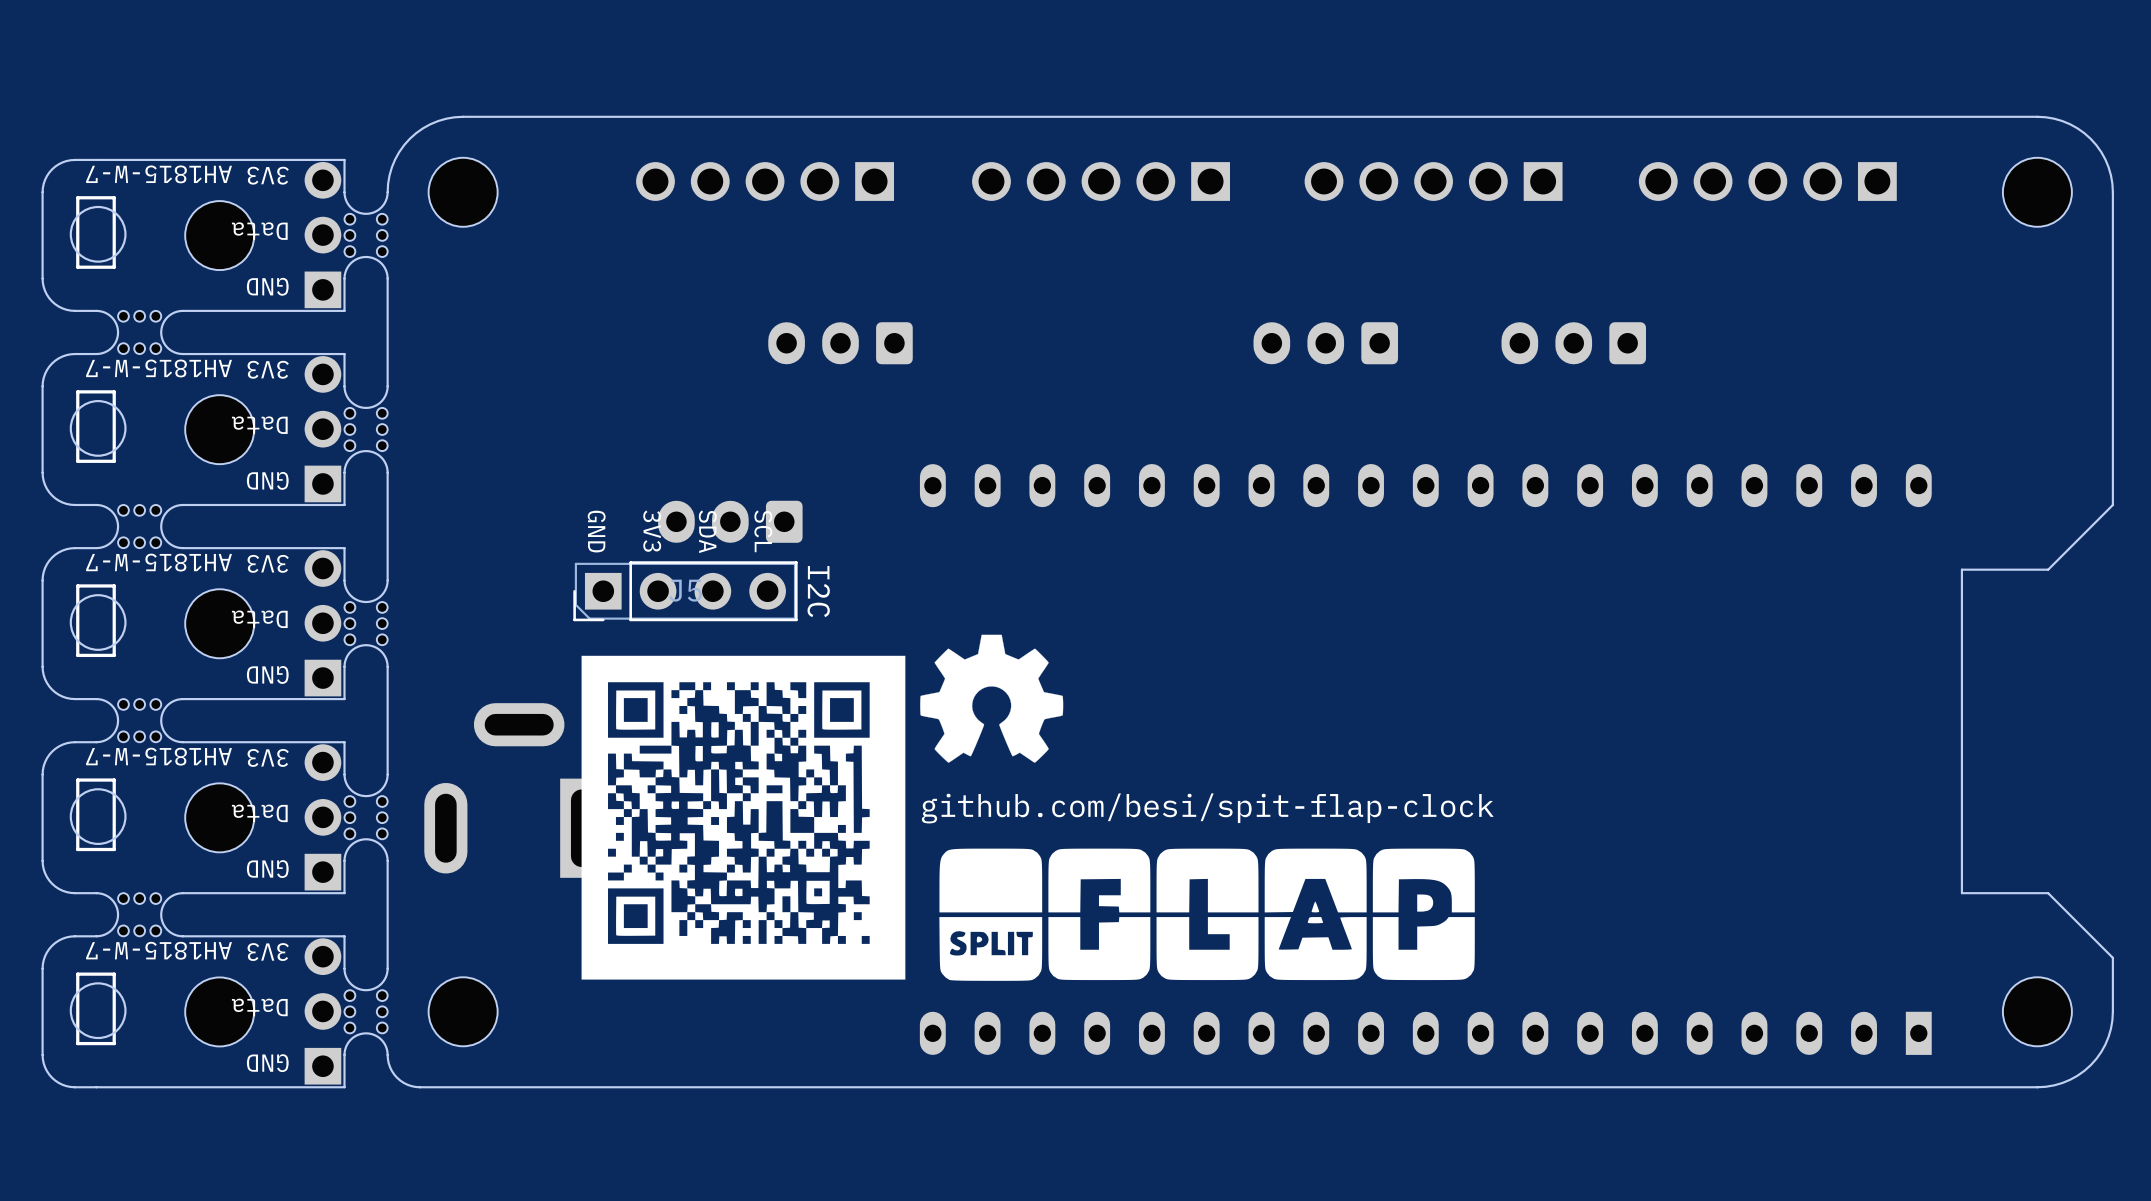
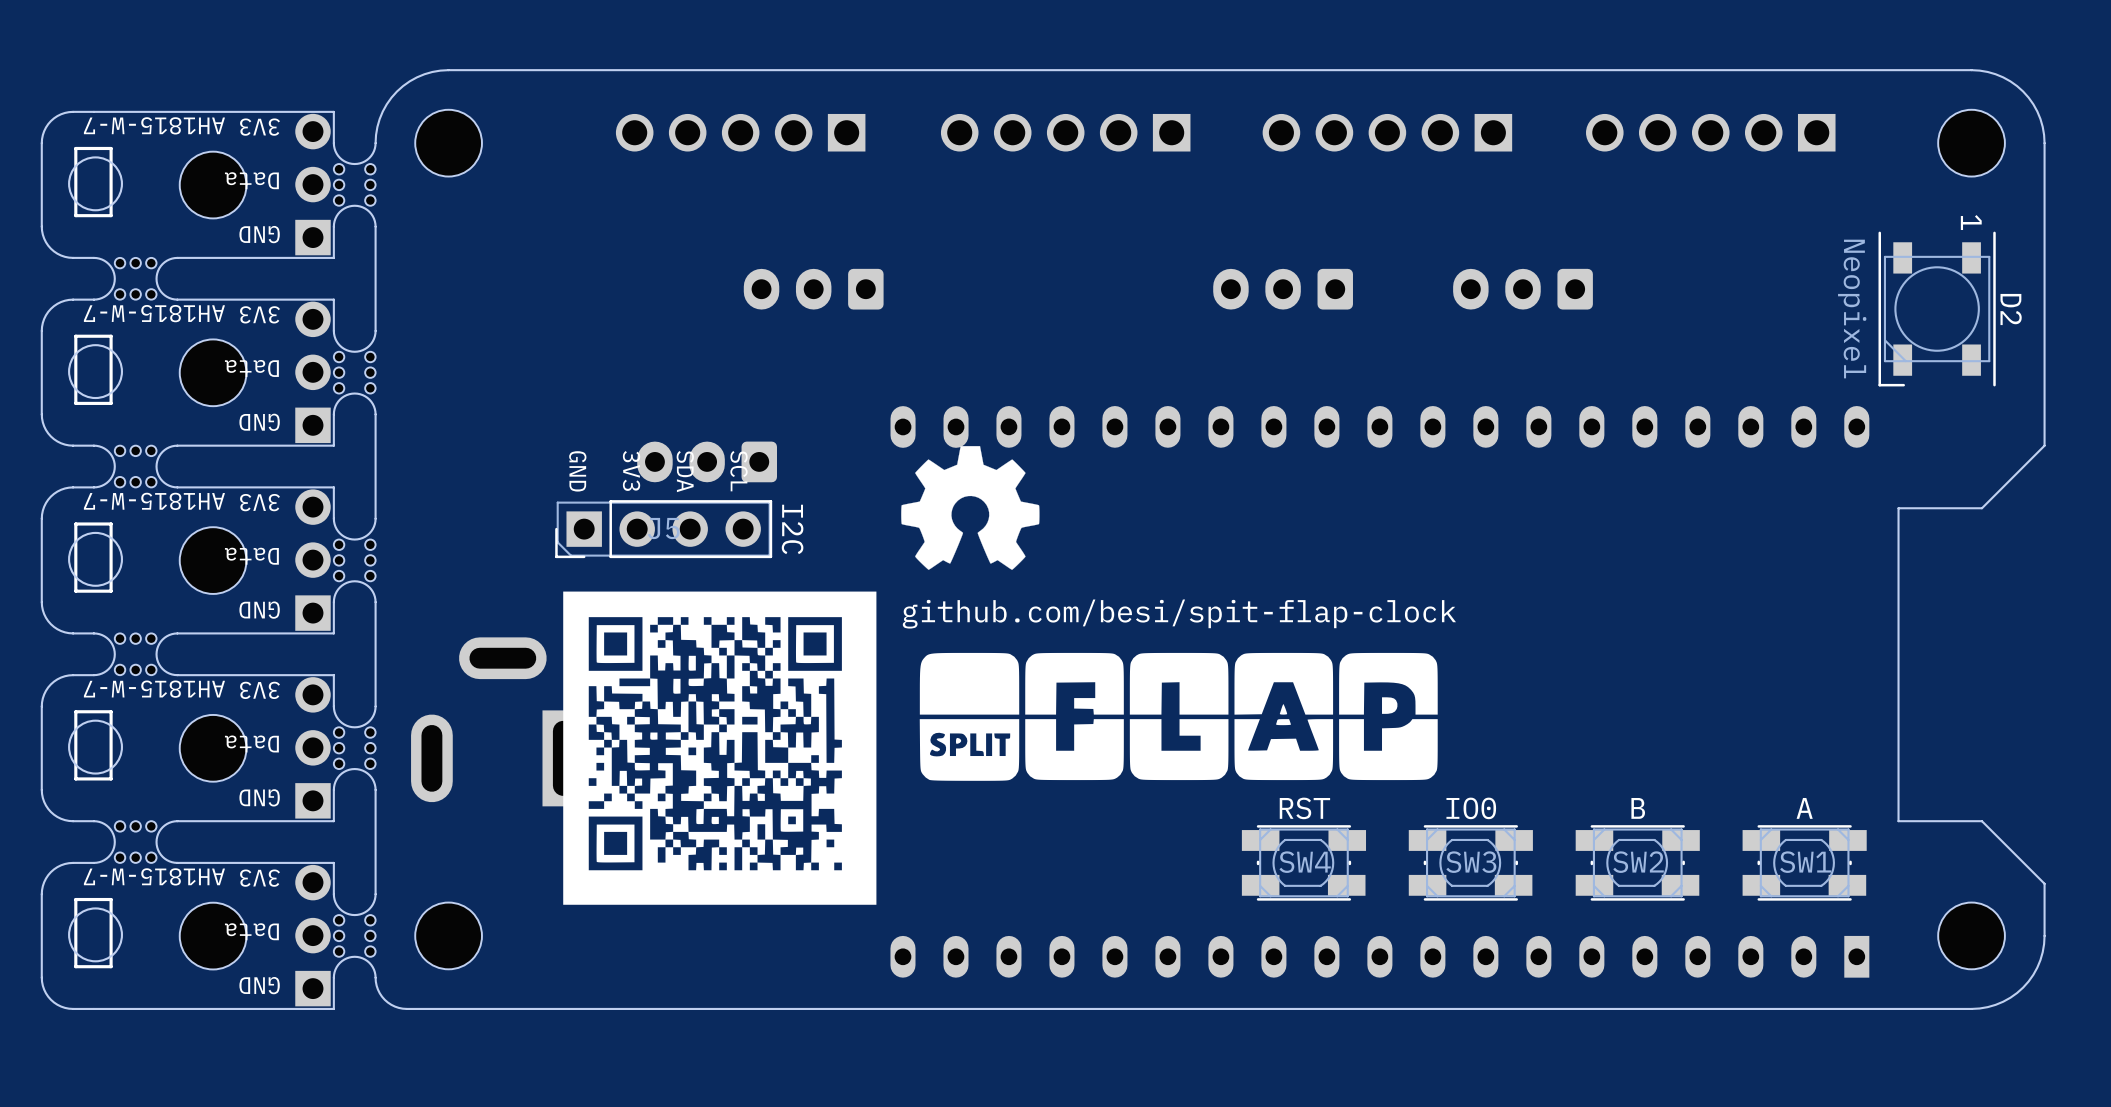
D2: none -> Neopixel (1937, 309)
drawing position: (991, 698) -> (970, 507)
drawing position: (1207, 914) -> (1178, 716)
SW4: none -> RST (1303, 862)
SW3: none -> IO0 (1470, 862)
SW2: none -> B (1637, 862)
SW1: none -> A (1804, 862)

